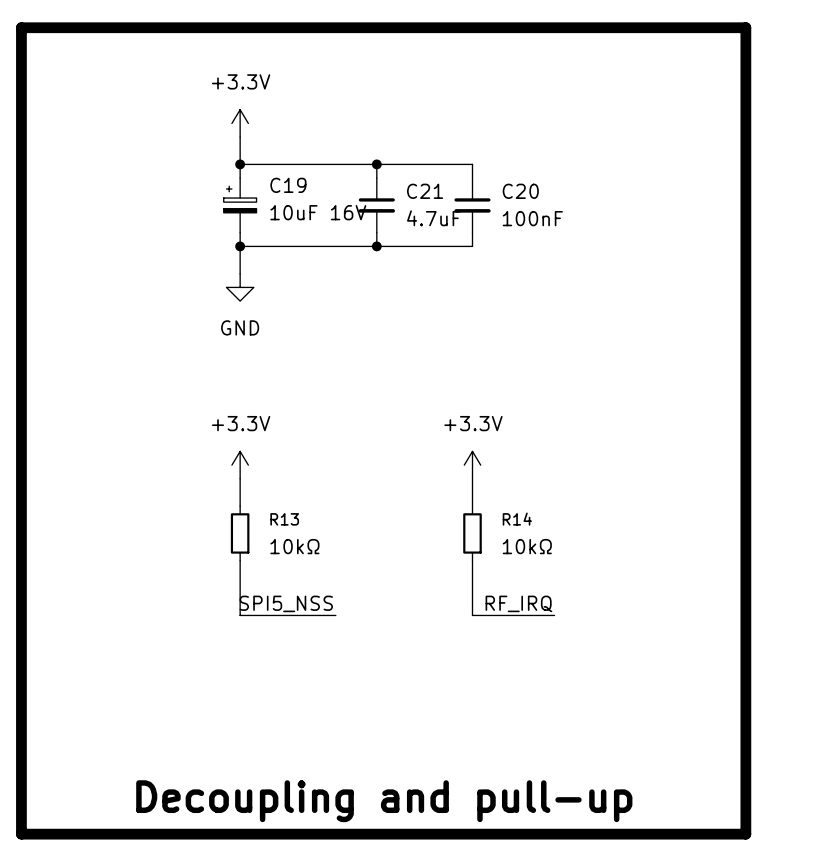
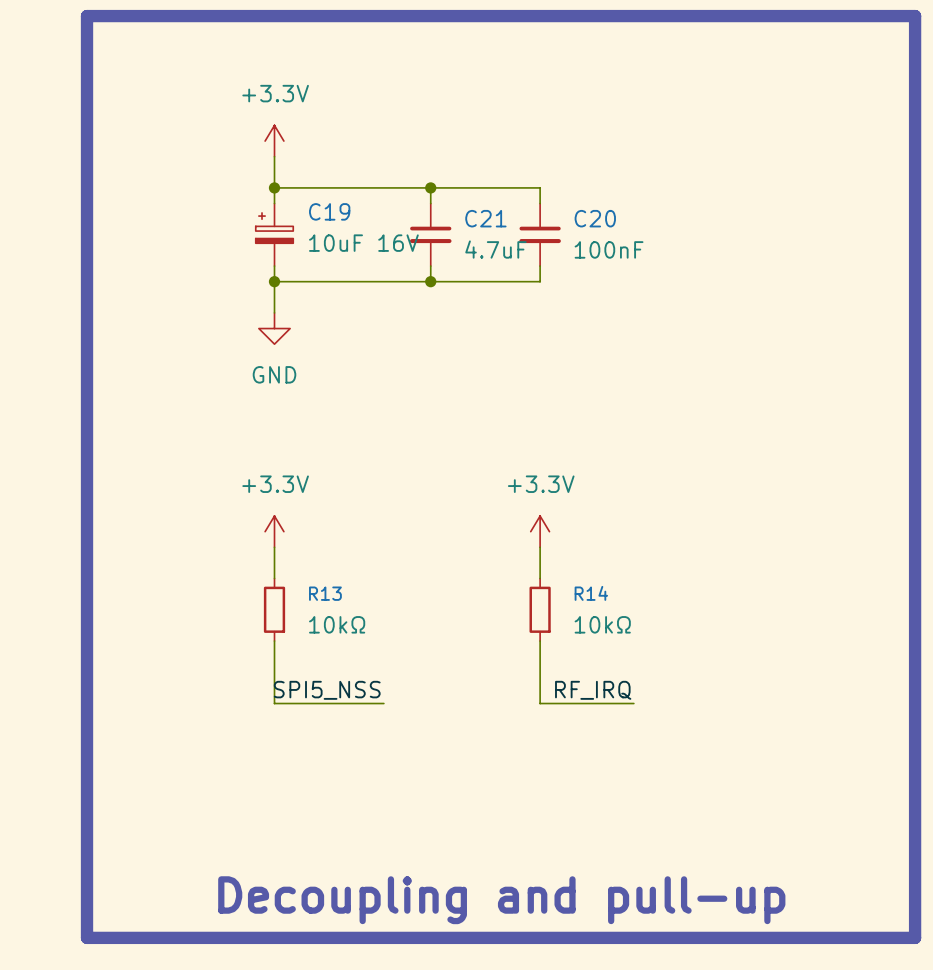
line: (21, 27) (745, 27) (745, 834) (21, 834) (21, 27) -> (87, 16) (915, 16) (915, 937) (87, 937) (87, 16)
text position: Decoupling and pull-up (384, 801) -> Decoupling and pull-up (501, 900)

